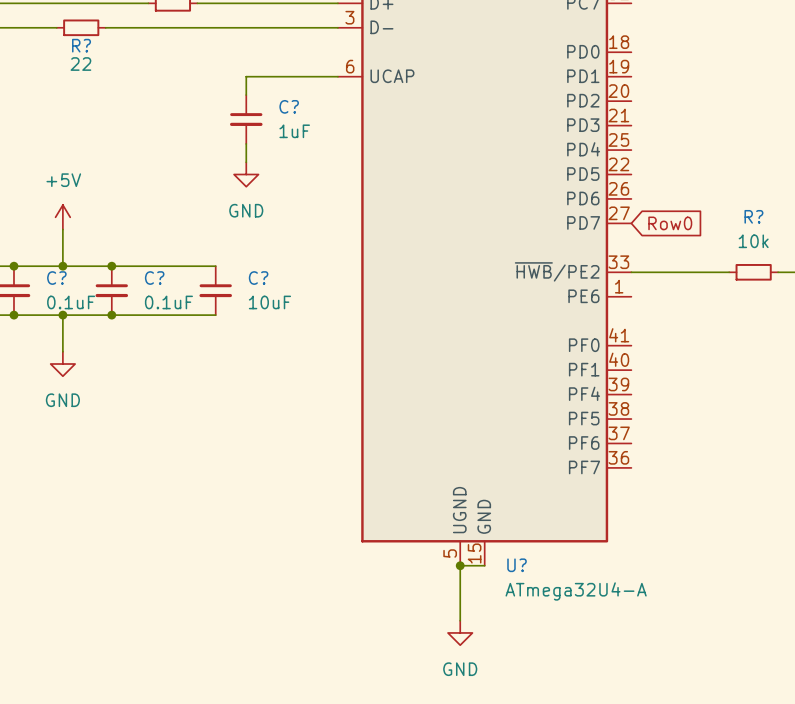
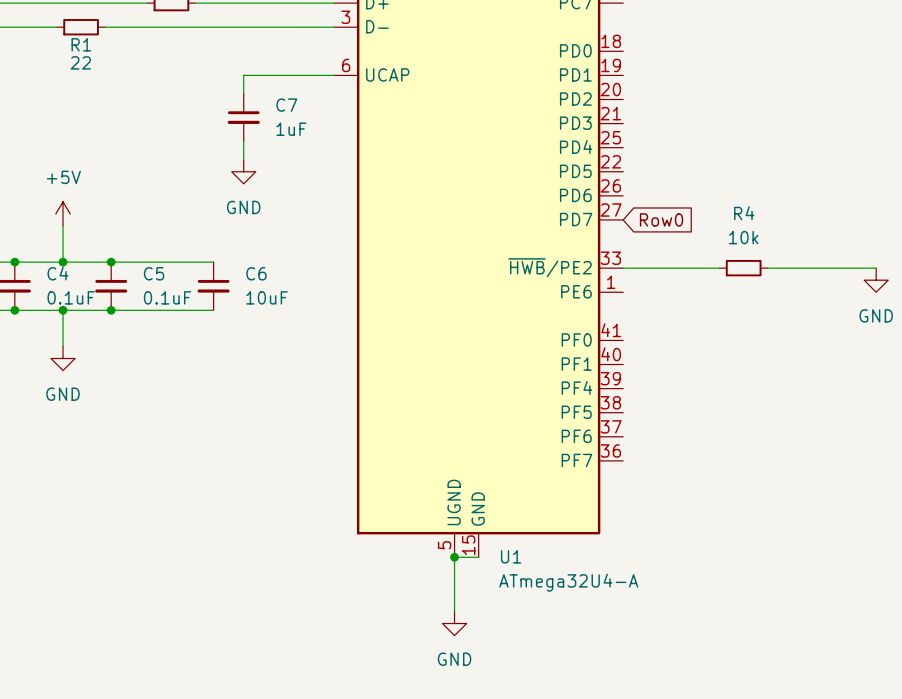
R? name: R? (81, 45) -> R1 (81, 44)
C? name: C? (289, 106) -> C7 (286, 105)
R? name: R? (753, 216) -> R4 (744, 213)
C? name: C? (56, 278) -> C4 (57, 273)
C? name: C? (154, 278) -> C5 (154, 273)
C? name: C? (258, 278) -> C6 (256, 273)
U? name: U? (517, 565) -> U1 (511, 556)

